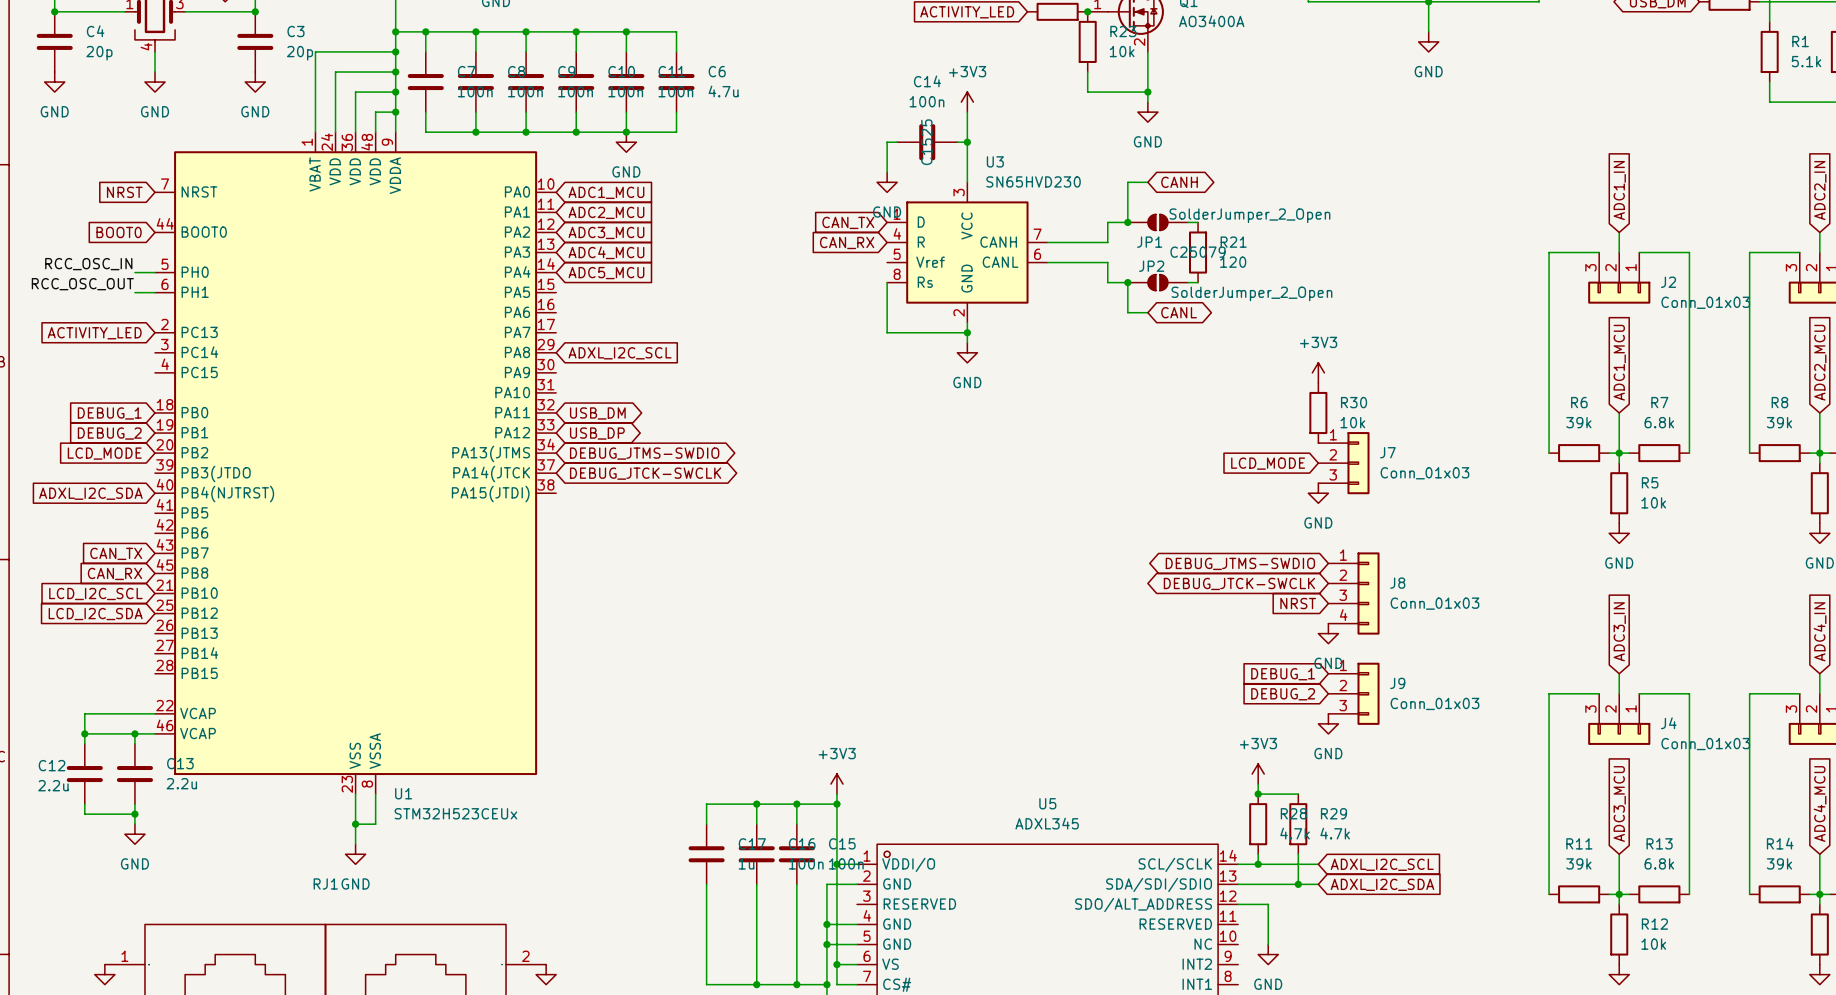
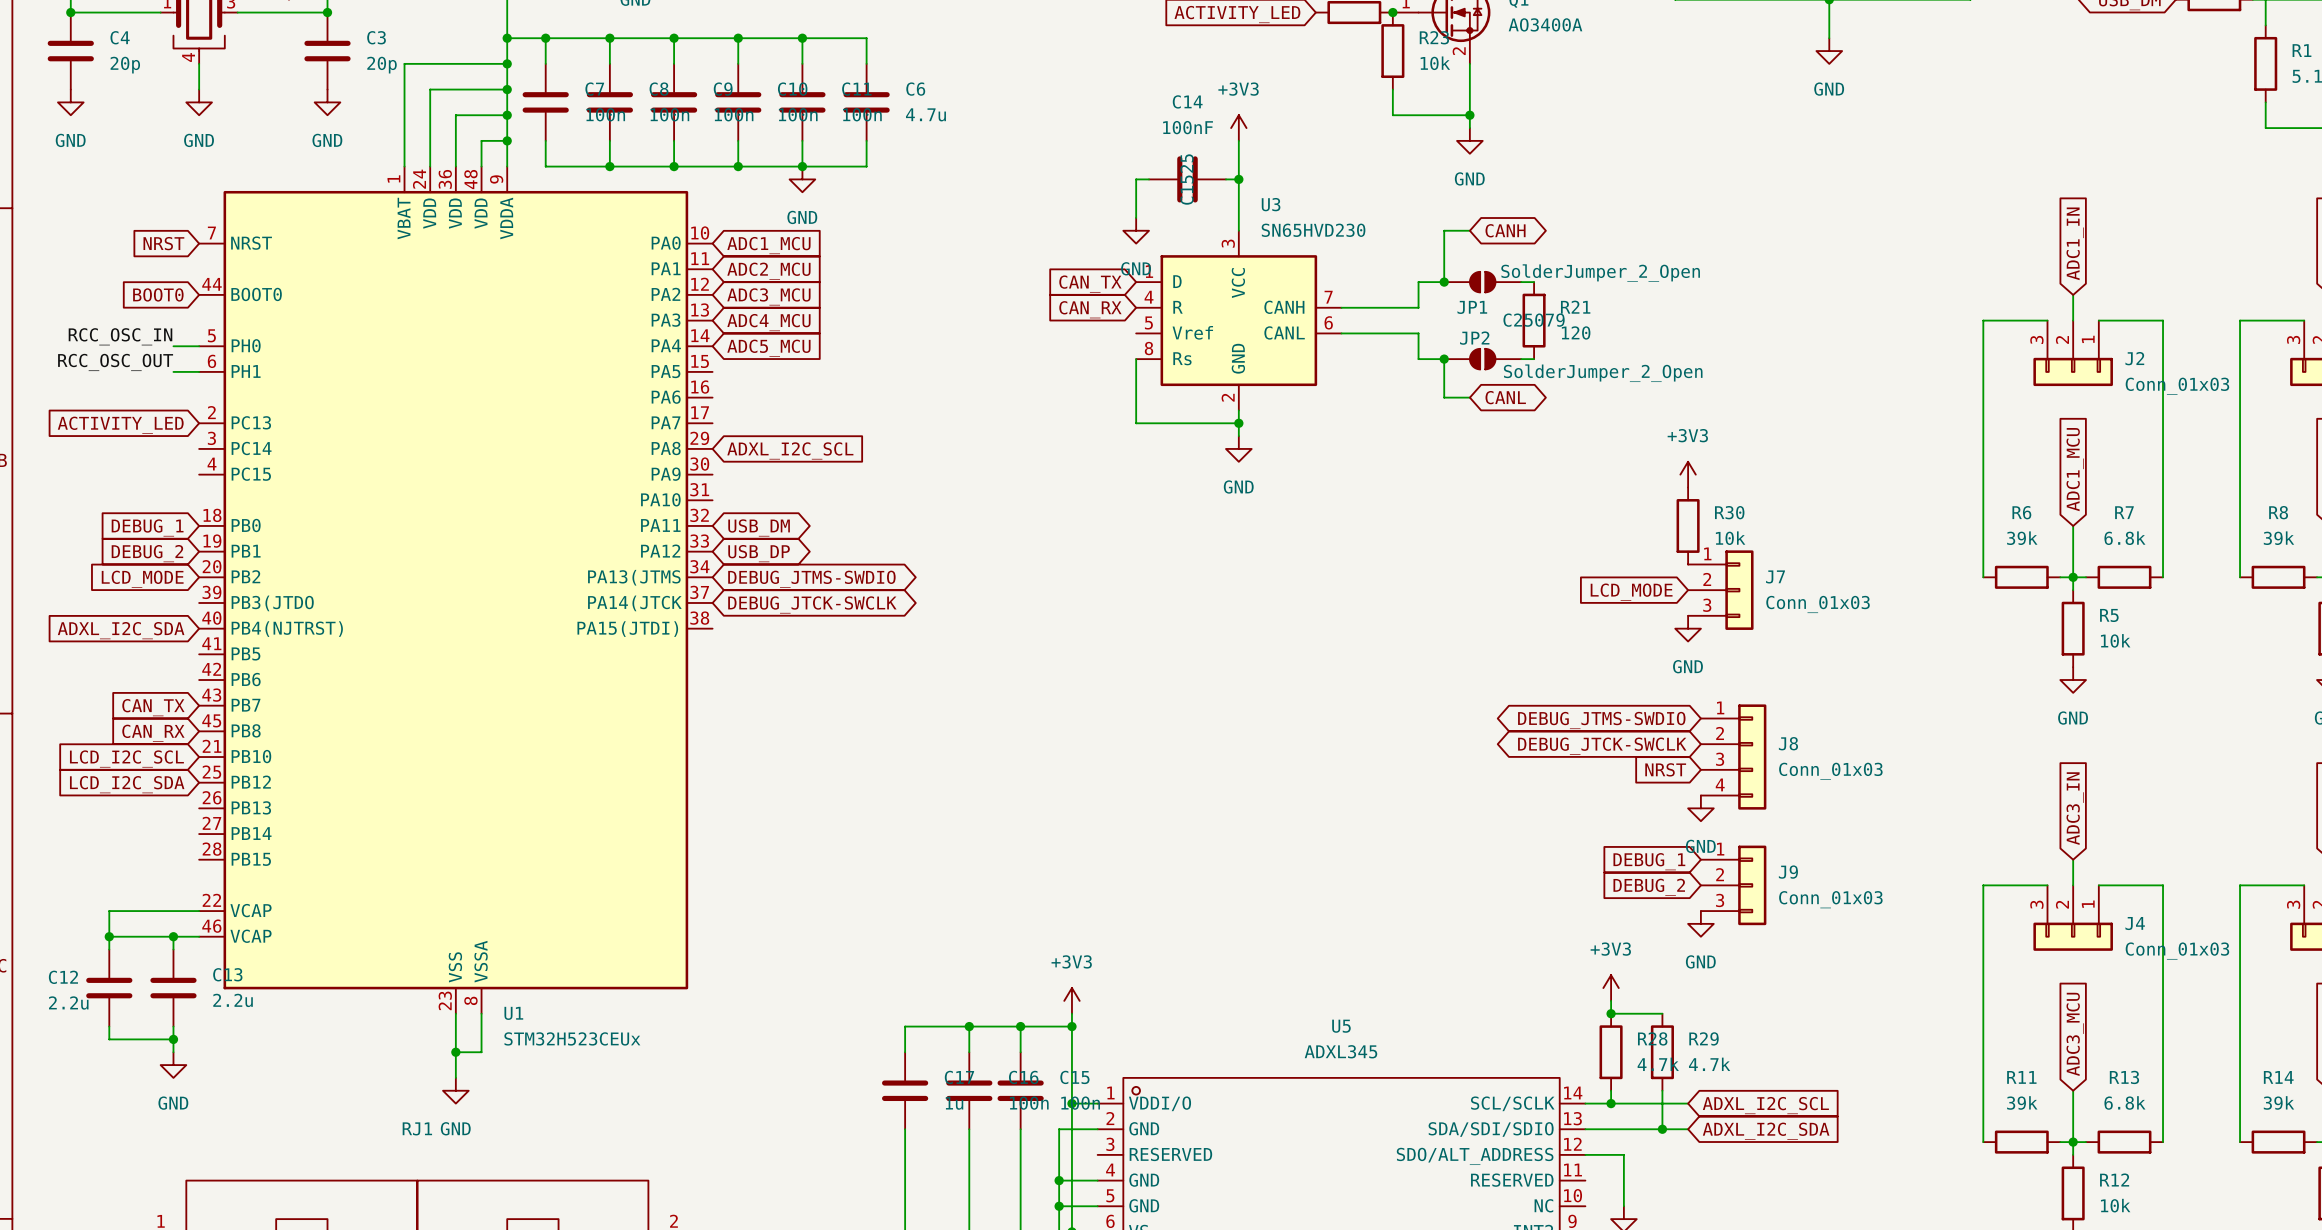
C14 value: 100n (927, 101) -> 100nF (1188, 127)

